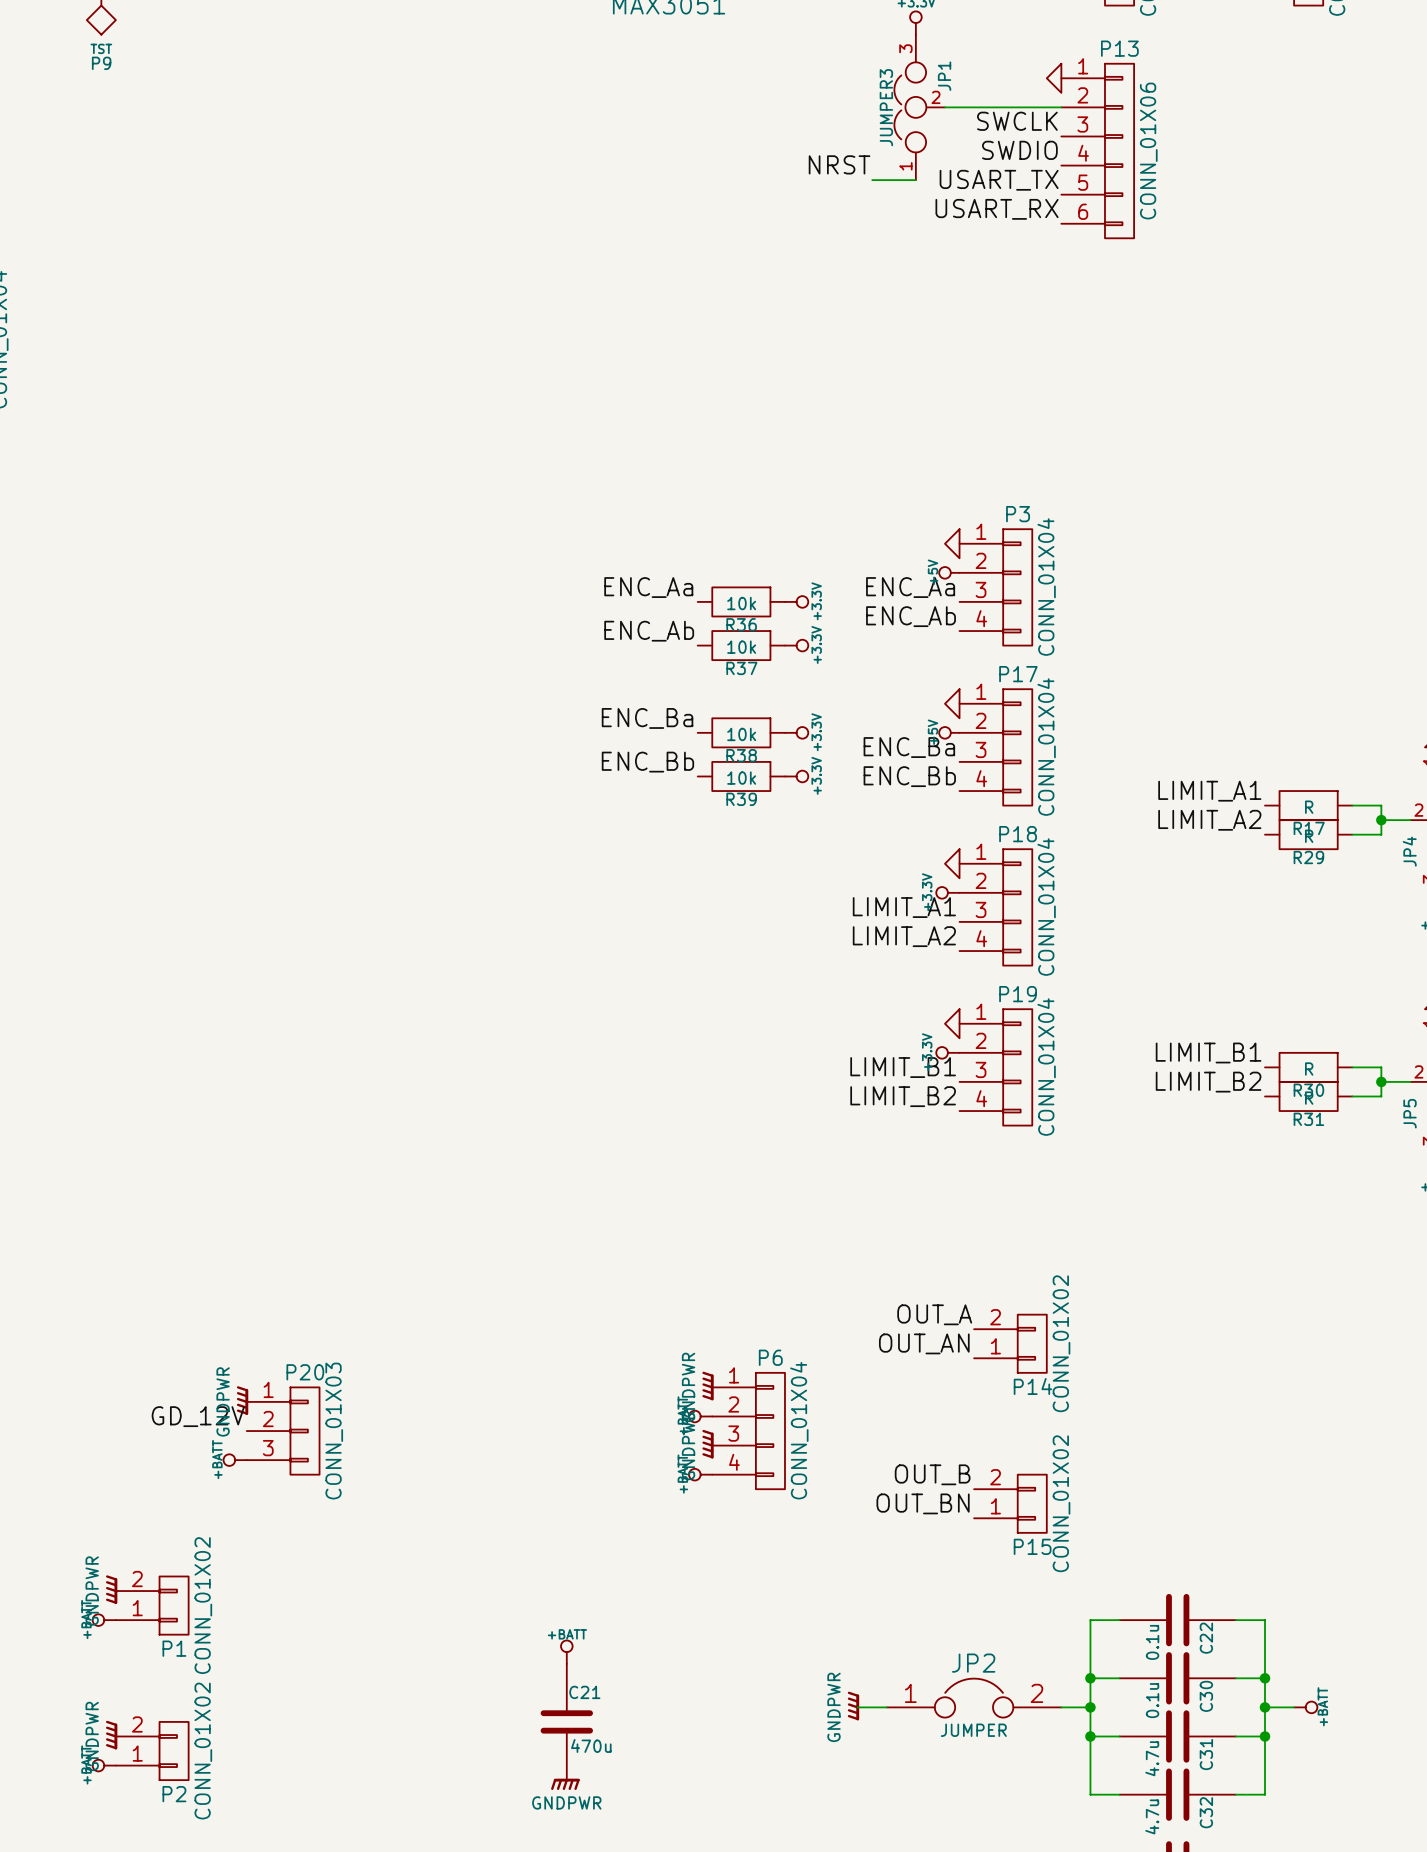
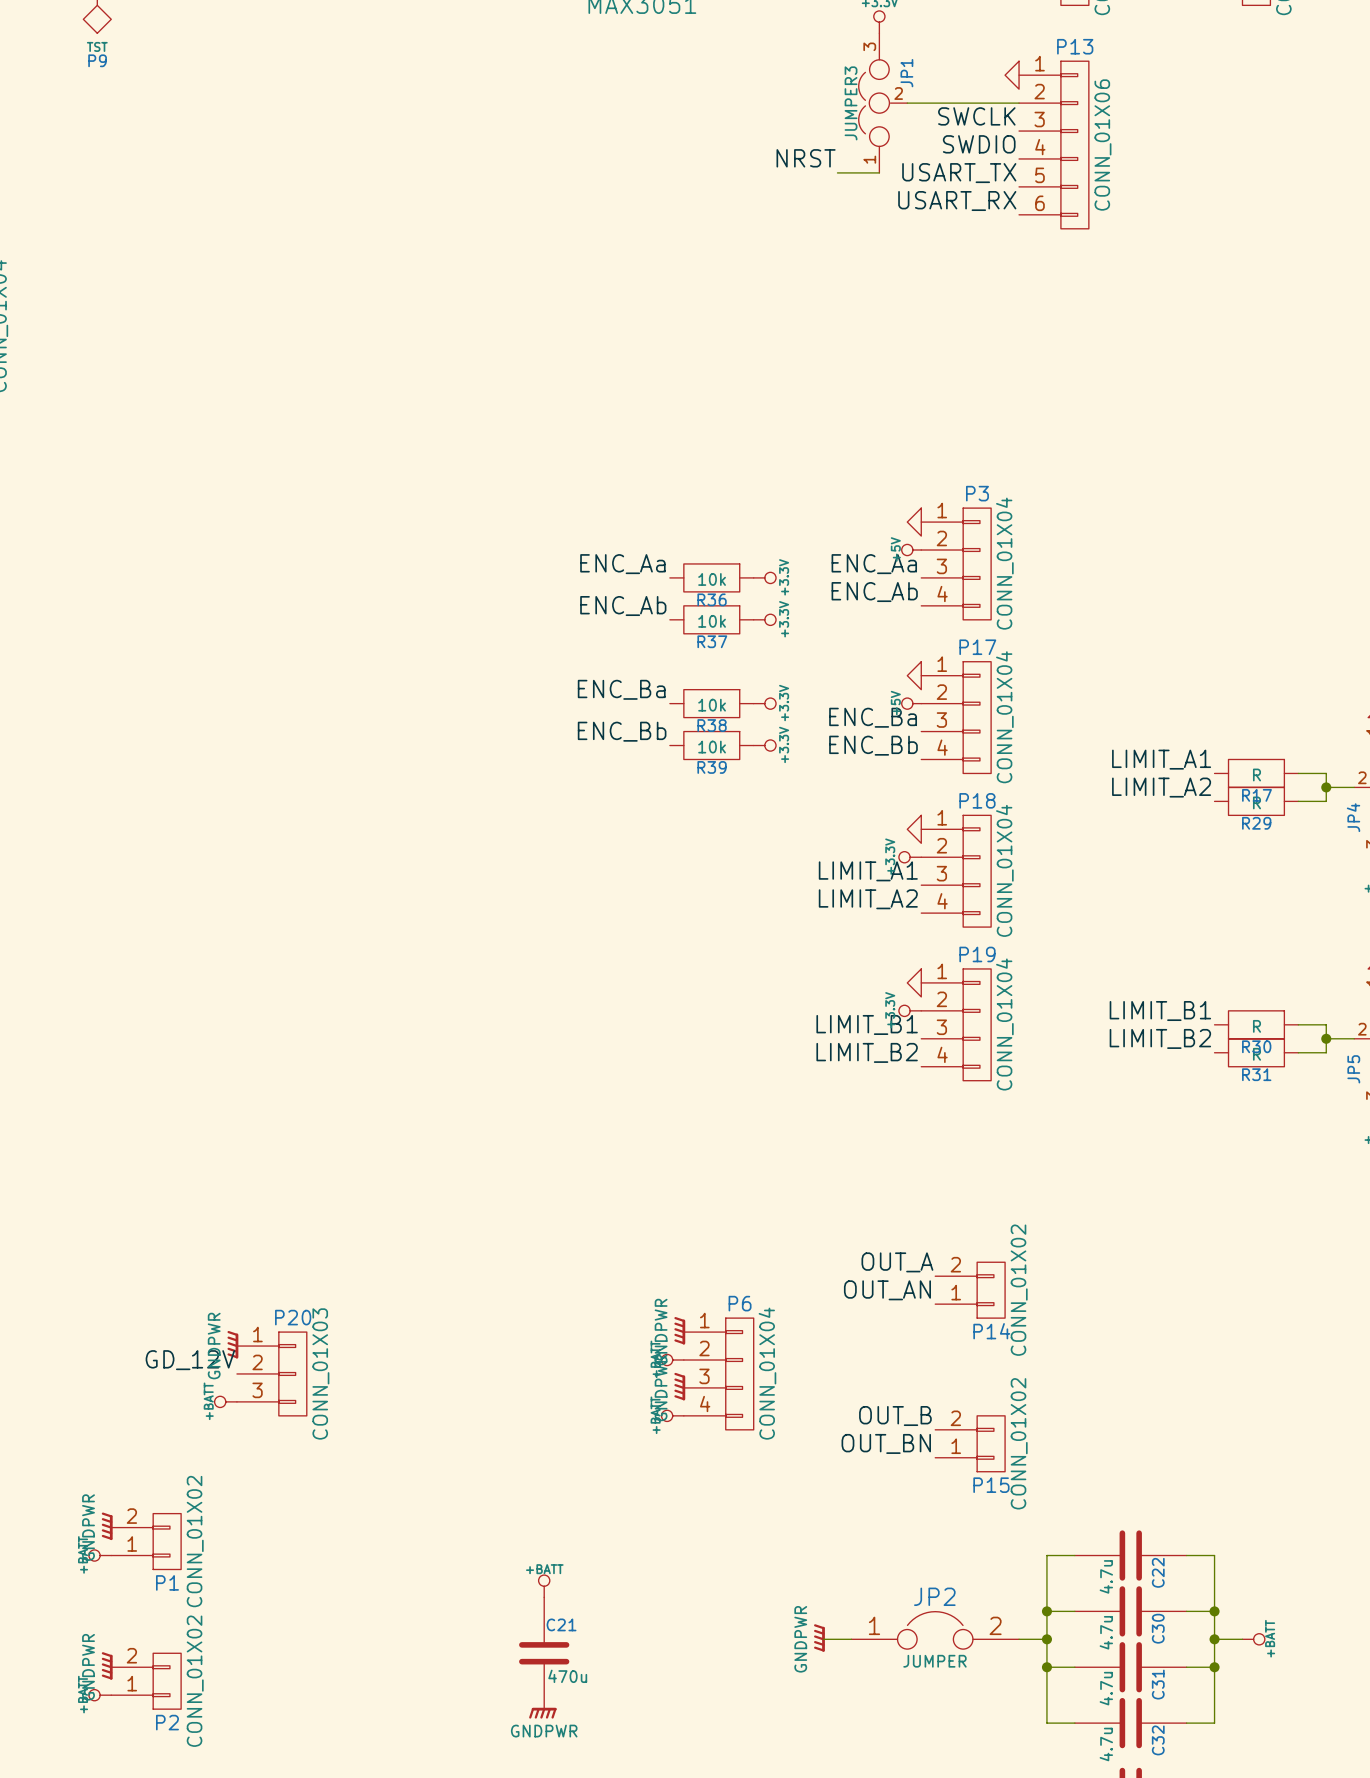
C22 value: 0.1u (1152, 1642) -> 4.7u (1106, 1576)
C30 value: 0.1u (1152, 1700) -> 4.7u (1106, 1632)

